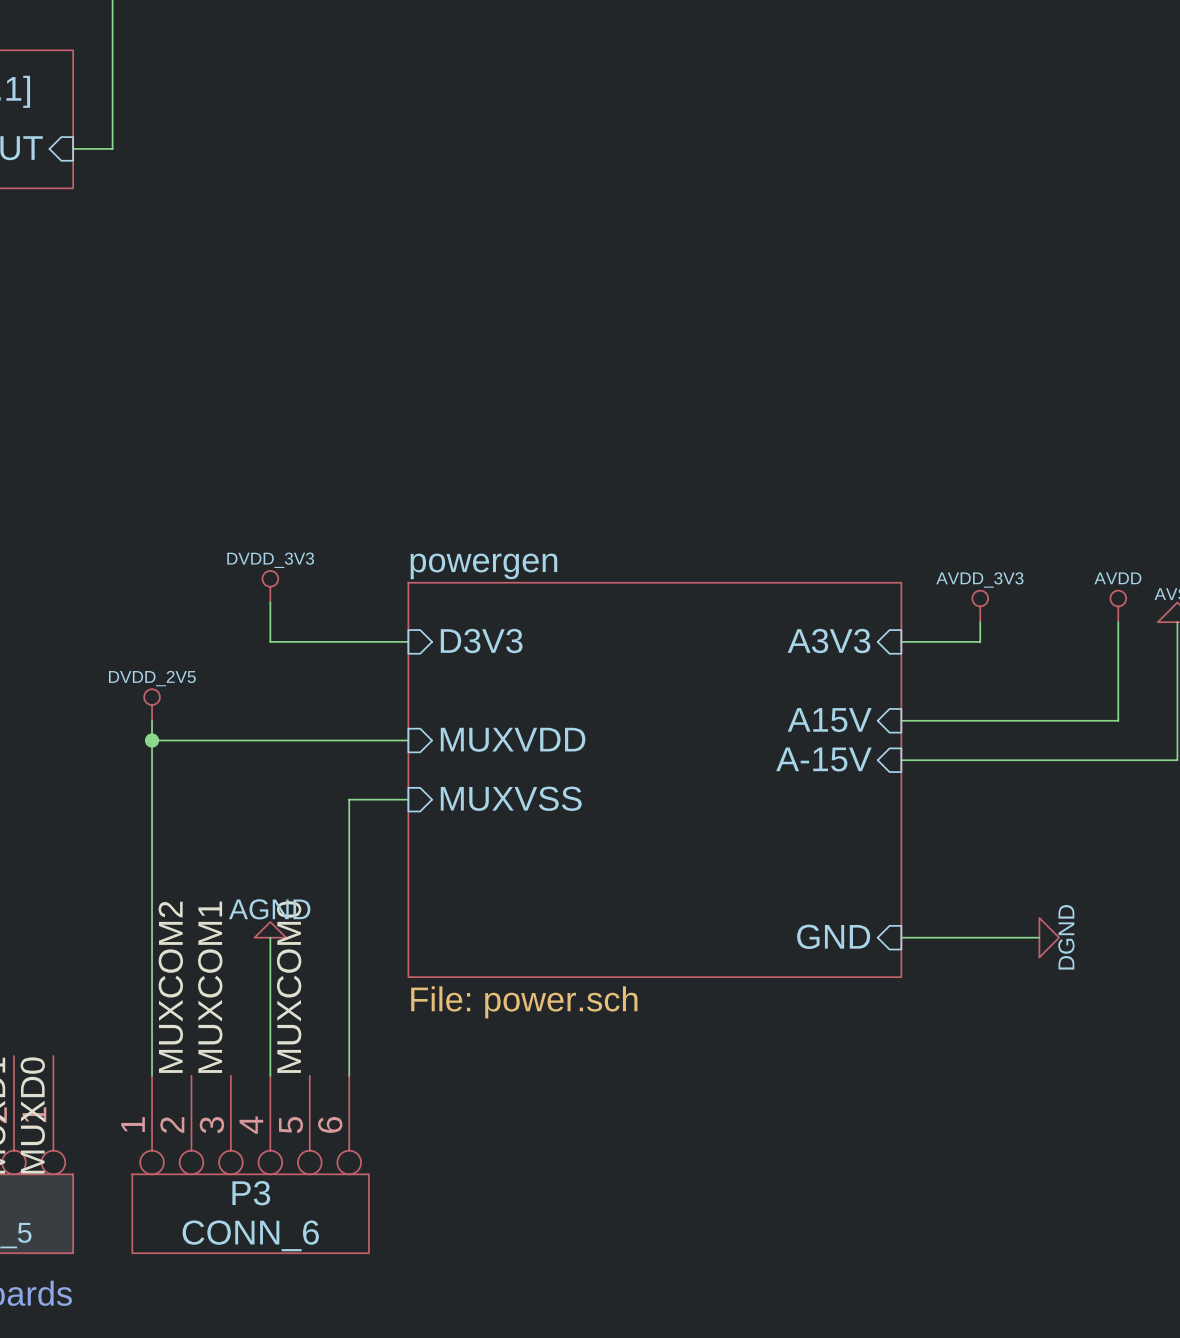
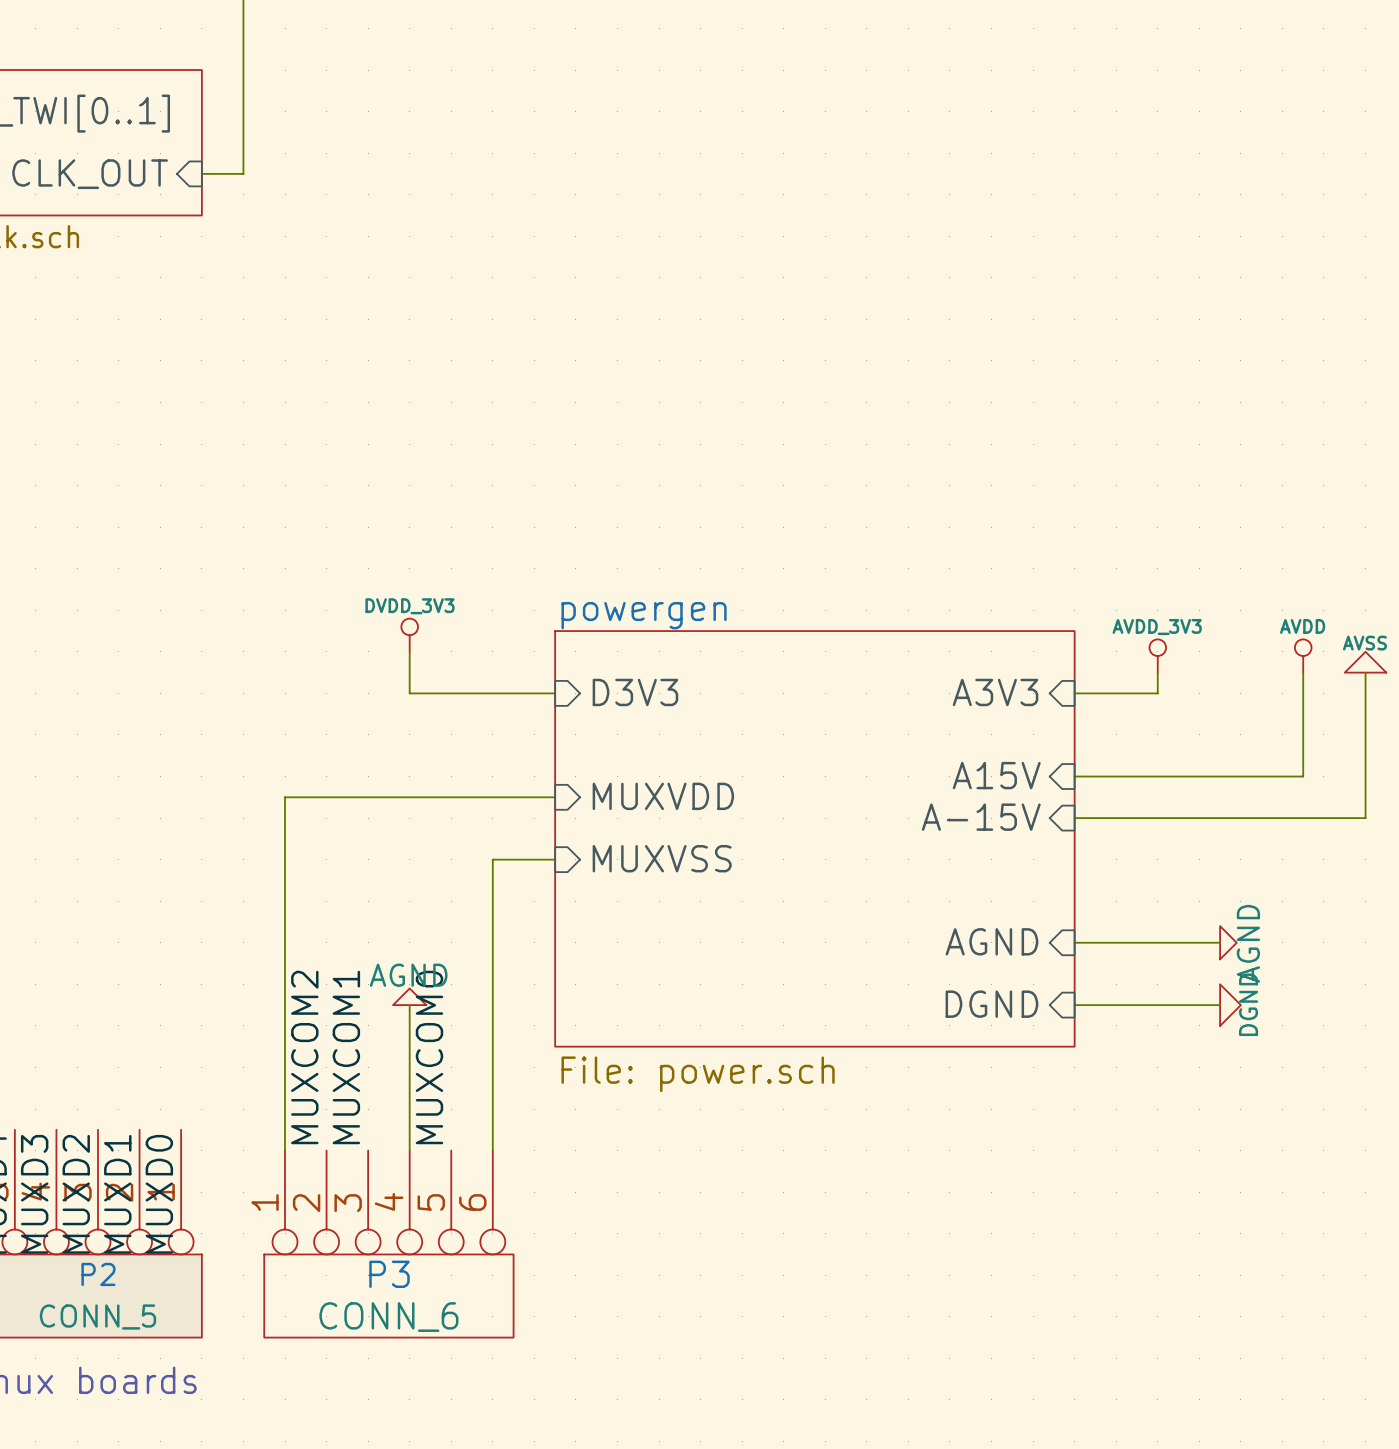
power symbol: DVDD_2V5 (152, 705) -> none
wire: (152, 720) (152, 740) -> none
junction: (152, 740) -> none
sheet pin: none -> AGND (991, 941)
wire: none -> (1074, 942) (1220, 942)
power symbol: none -> AGND (1228, 942)
sheet pin: GND (833, 936) -> DGND (991, 1004)

